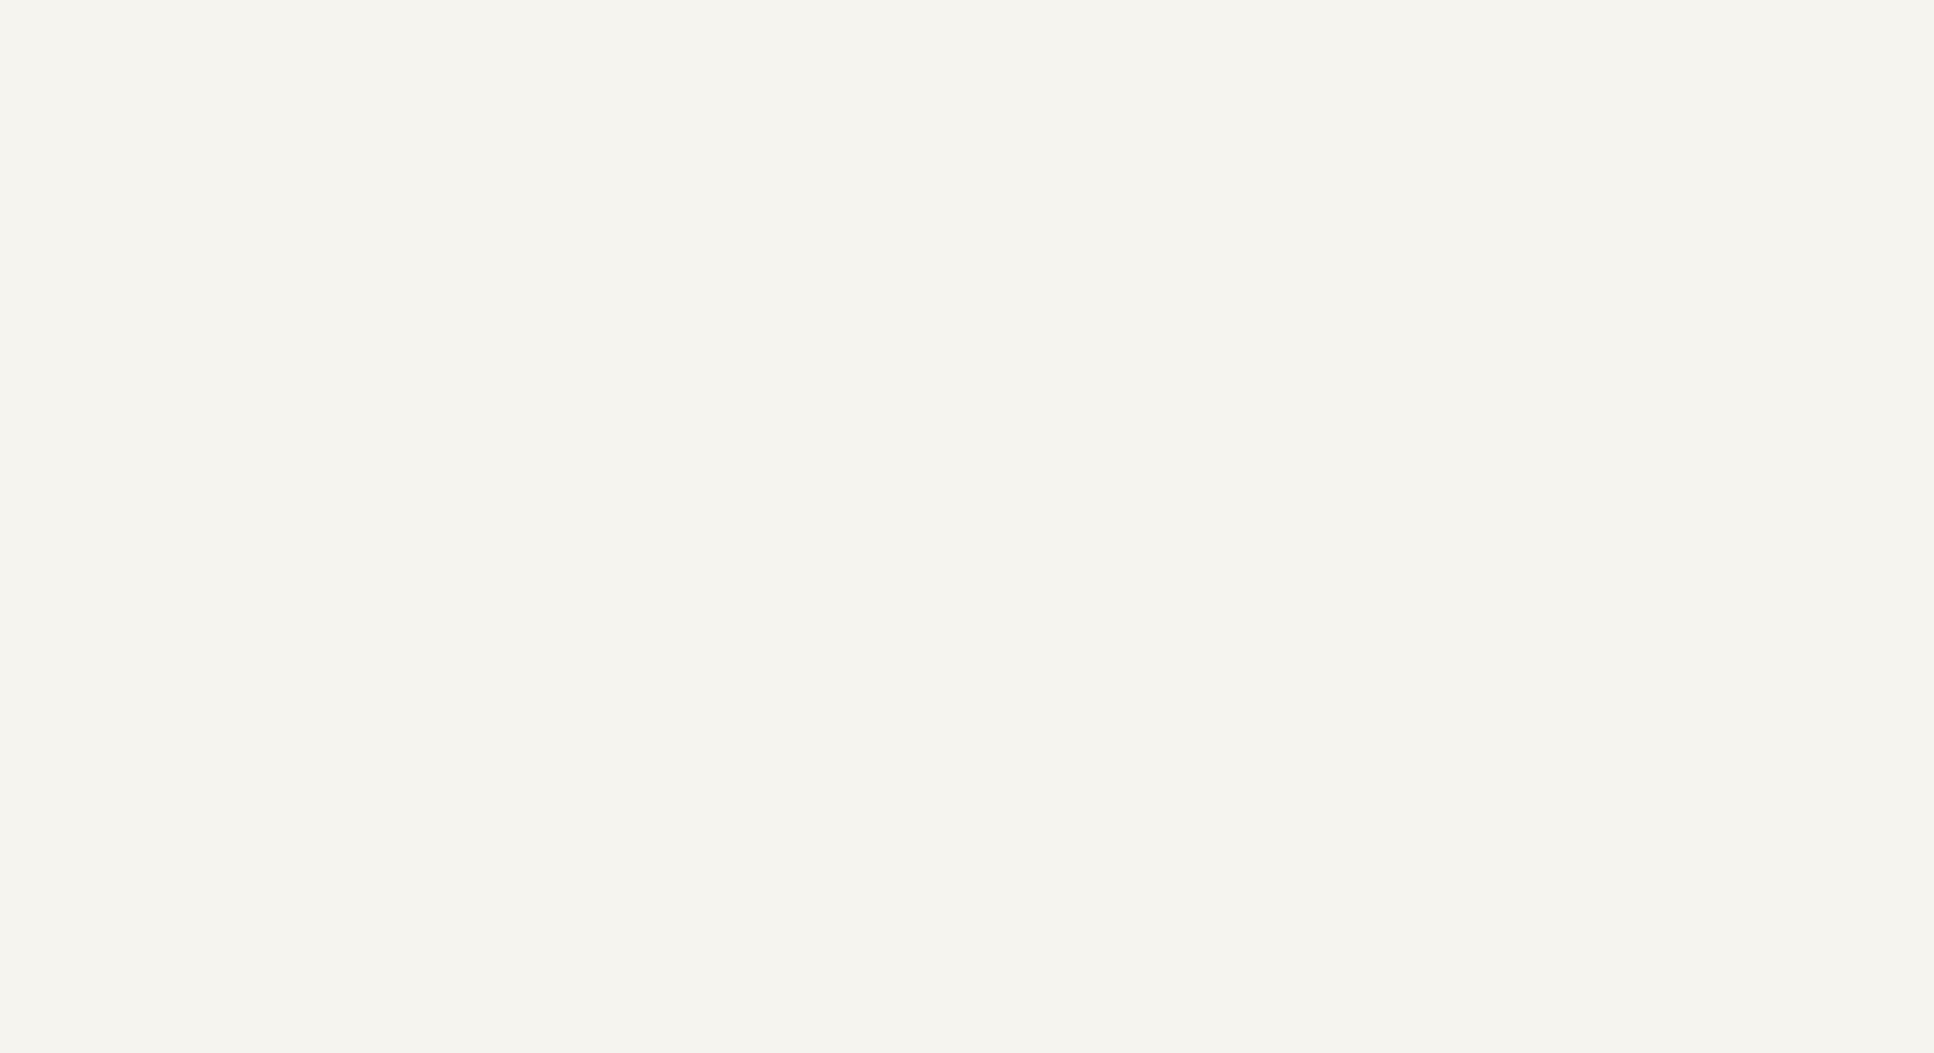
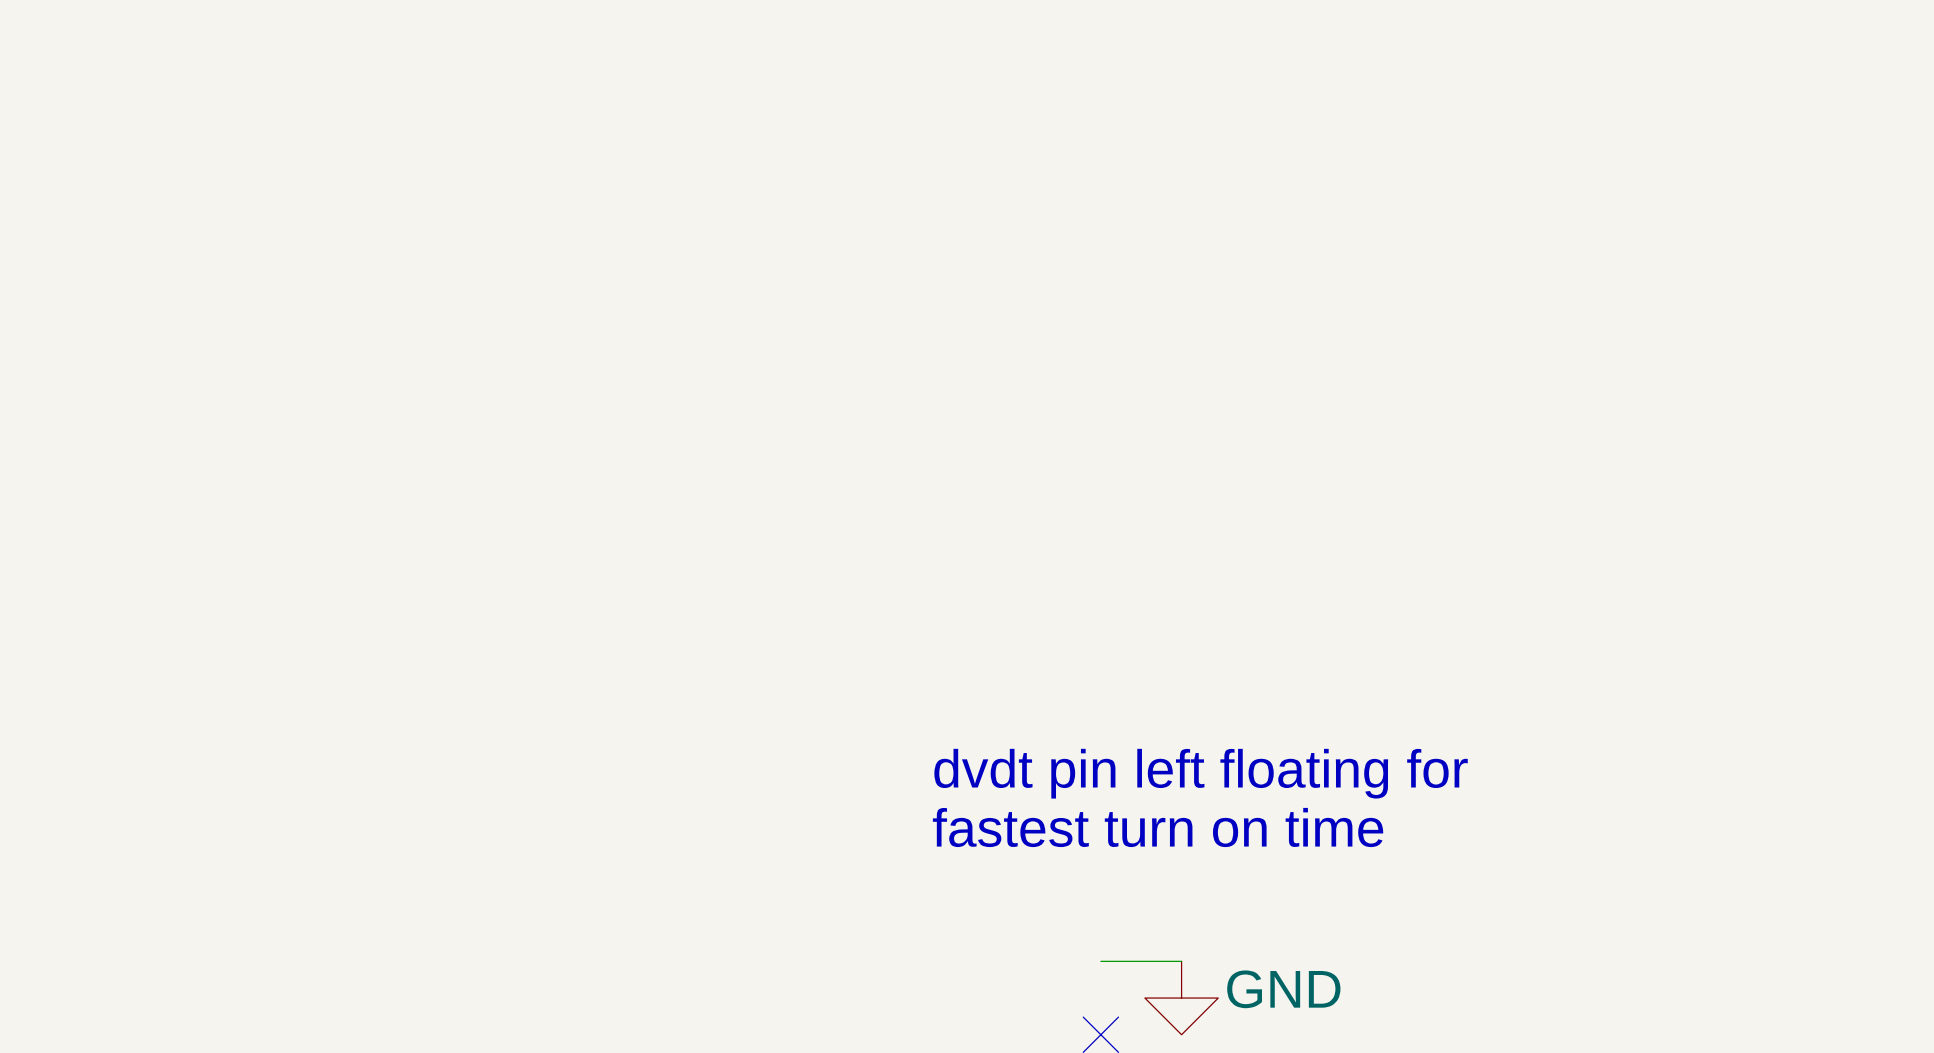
text: none -> dvdt pin left floating for (1201, 773)
text: none -> fastest turn on time (1158, 827)
wire: none -> (1100, 961) (1181, 961)
power symbol: none -> GND (1181, 998)
no-connect mark: none -> (1100, 1034)

